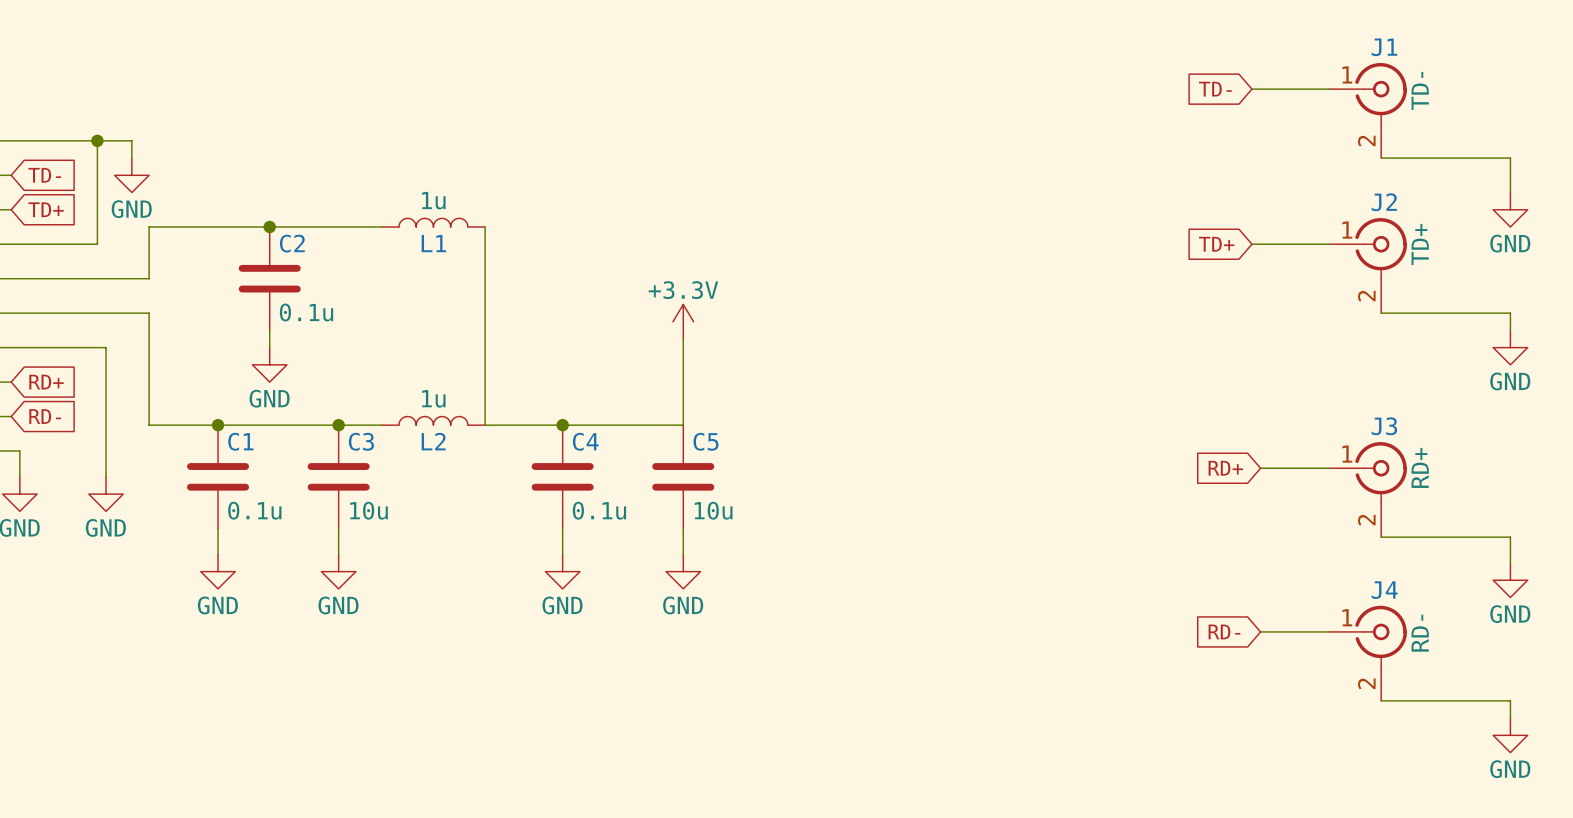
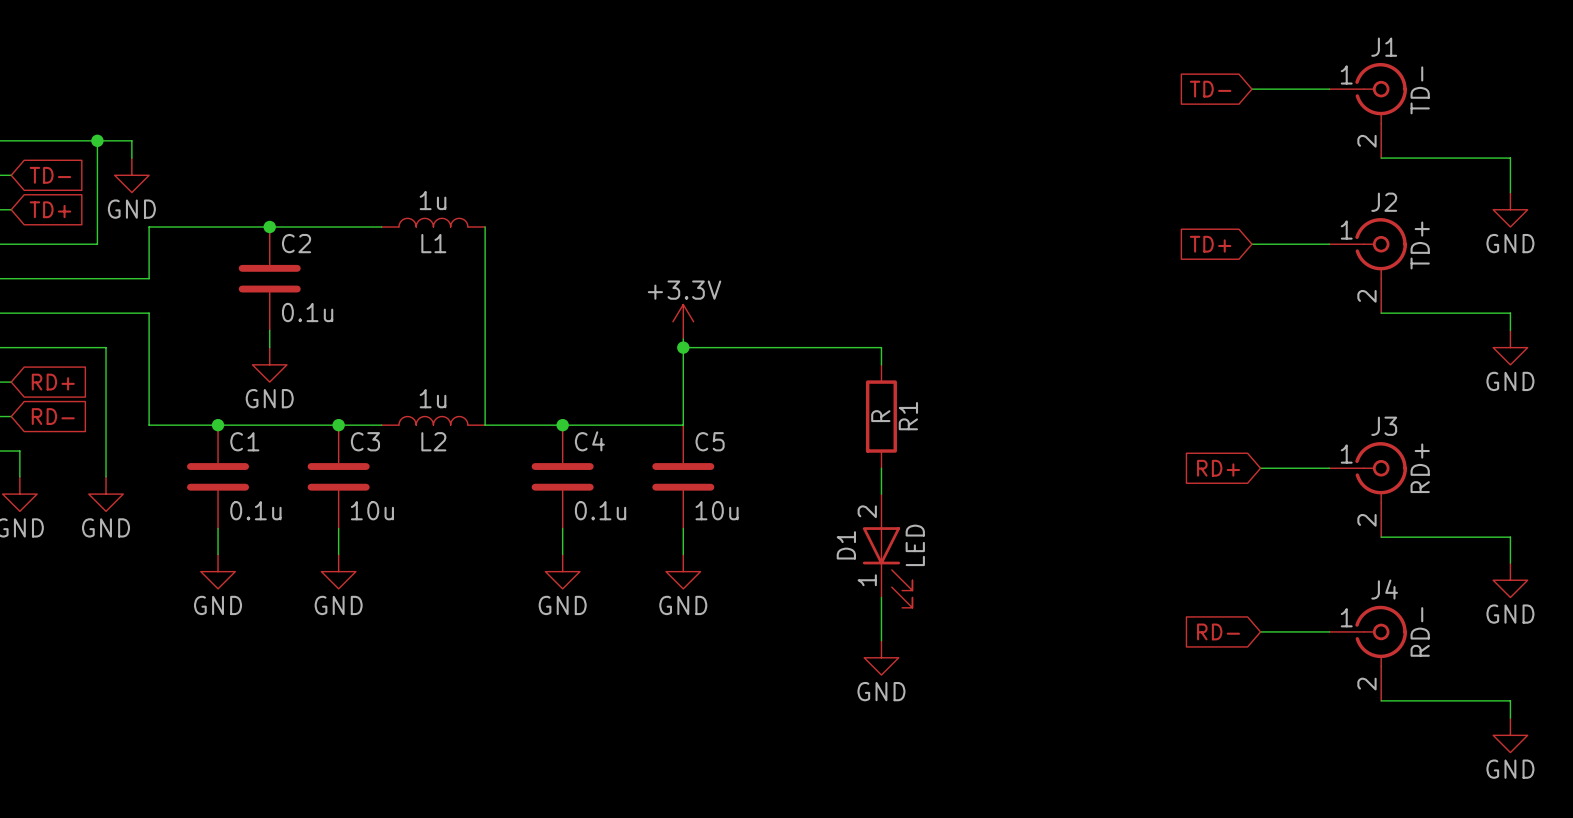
wire: none -> (683, 347) (881, 347) (881, 364)
junction: none -> (683, 347)
R1: none -> R (881, 416)
wire: none -> (881, 468) (881, 494)
D1: none -> LED (887, 550)
wire: none -> (881, 597) (881, 640)
power symbol: none -> GND (881, 657)

